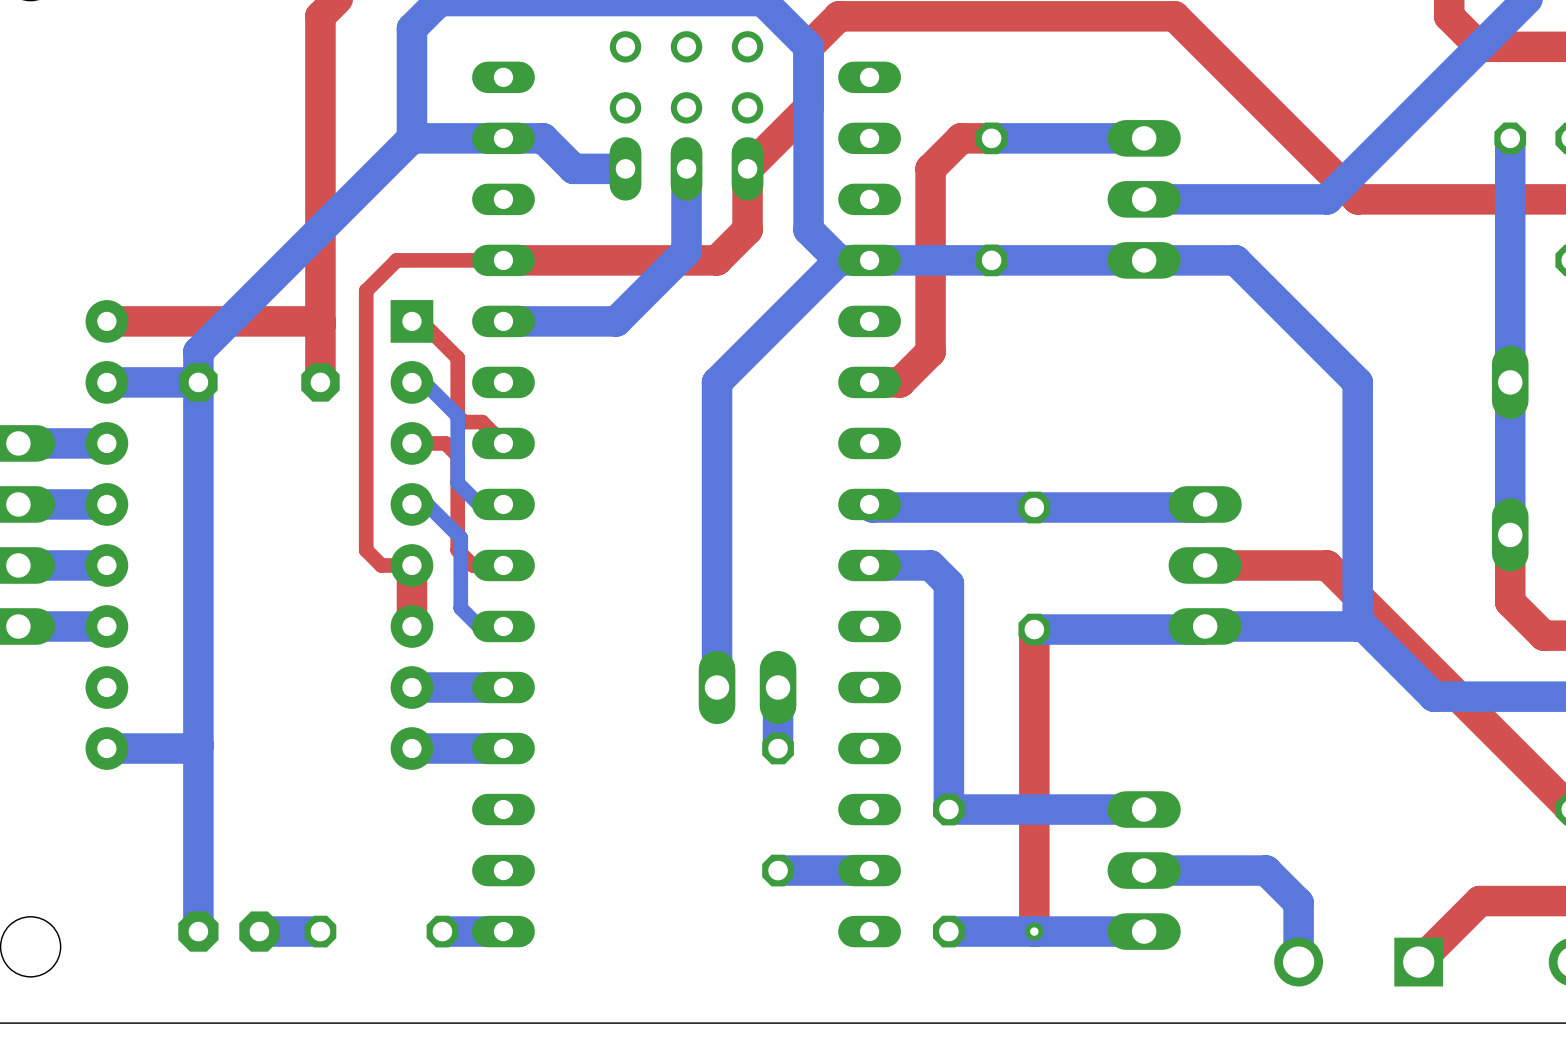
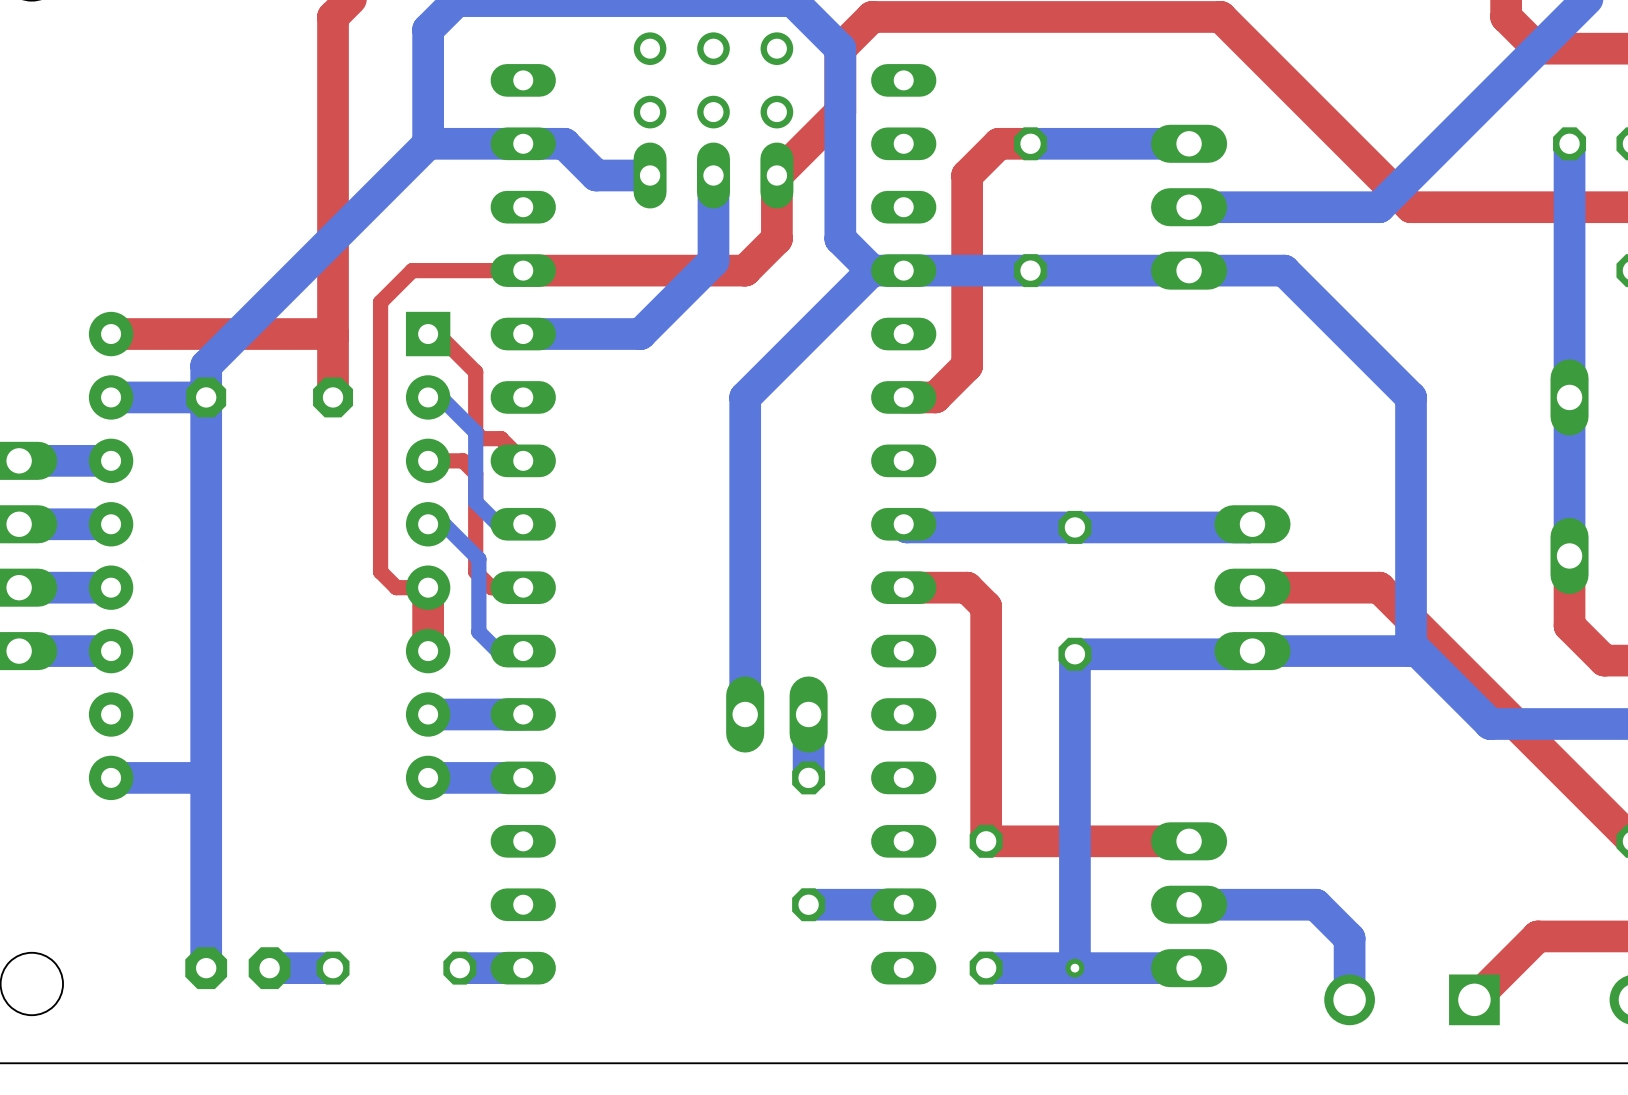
bottom track: (869, 565) (930, 565) (948, 583) (948, 809) (1144, 809) -> none
top track: none -> (903, 587) (967, 587) (986, 606) (986, 841) (1189, 841)
bottom track: none -> (1074, 654) (1074, 968)
top track: (1034, 629) (1034, 931) -> none

